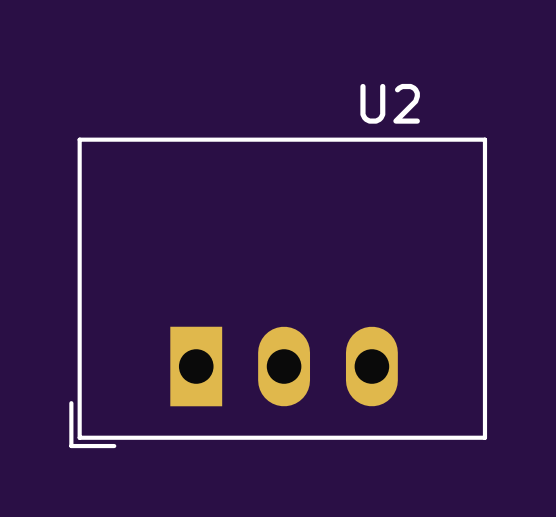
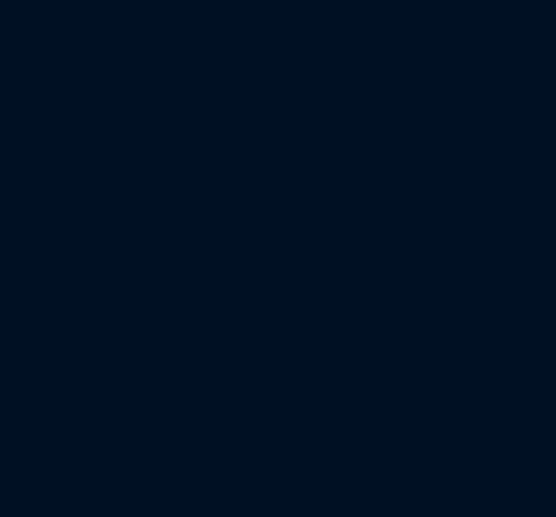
U2: (278, 292) -> none

